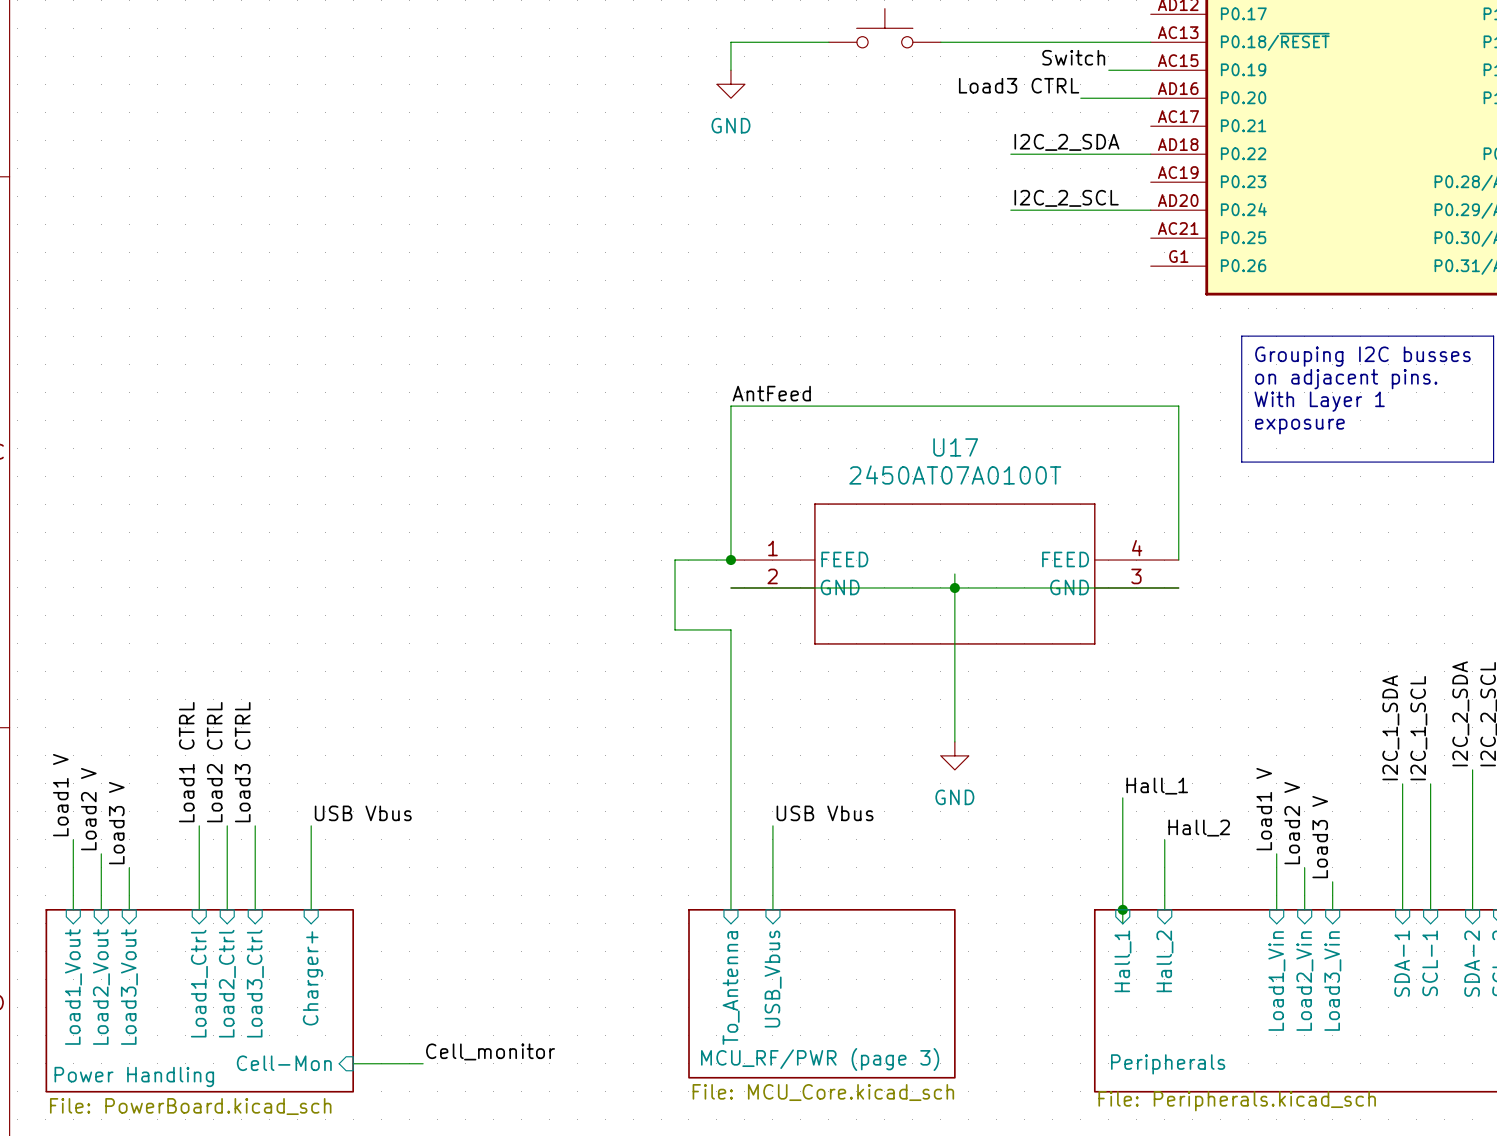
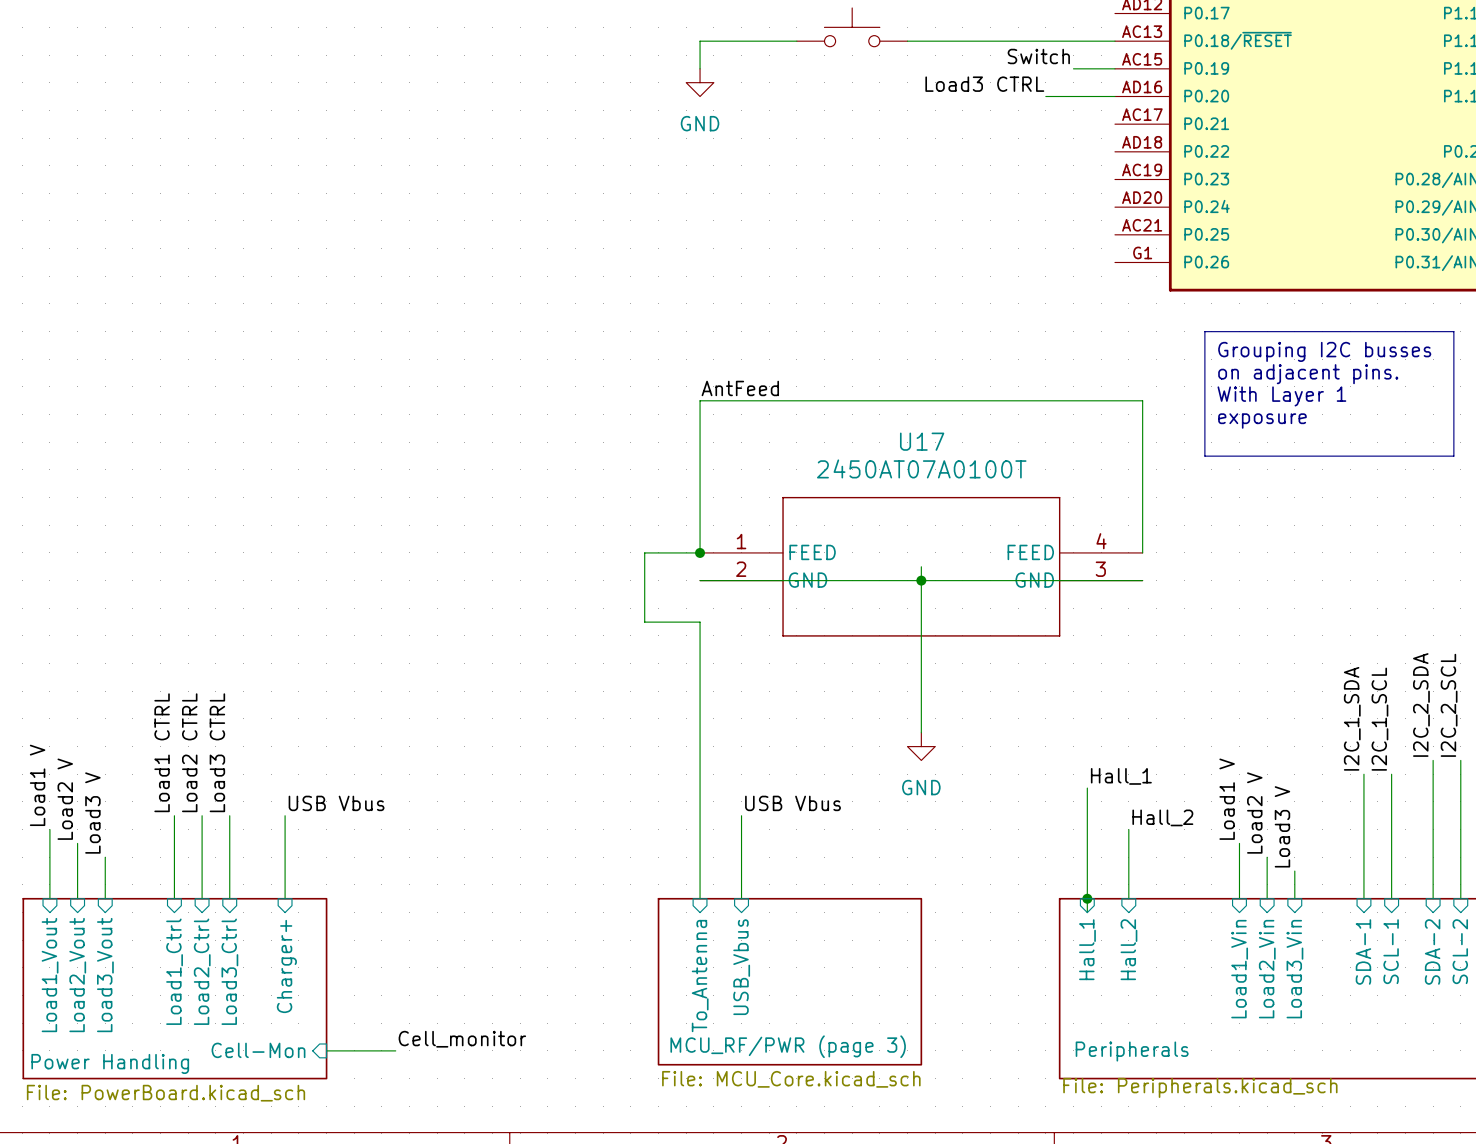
label: I2C_2_SDA (1066, 142) -> none
wire: (1010, 154) (1150, 154) -> none
label: I2C_2_SCL (1066, 198) -> none
wire: (1010, 210) (1150, 210) -> none

